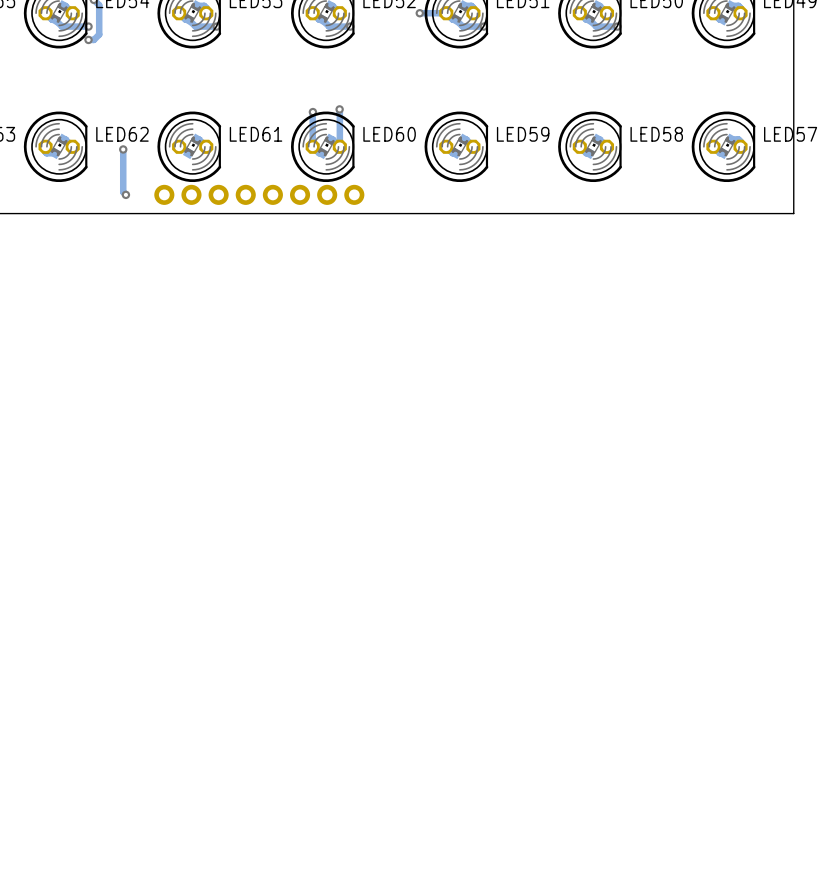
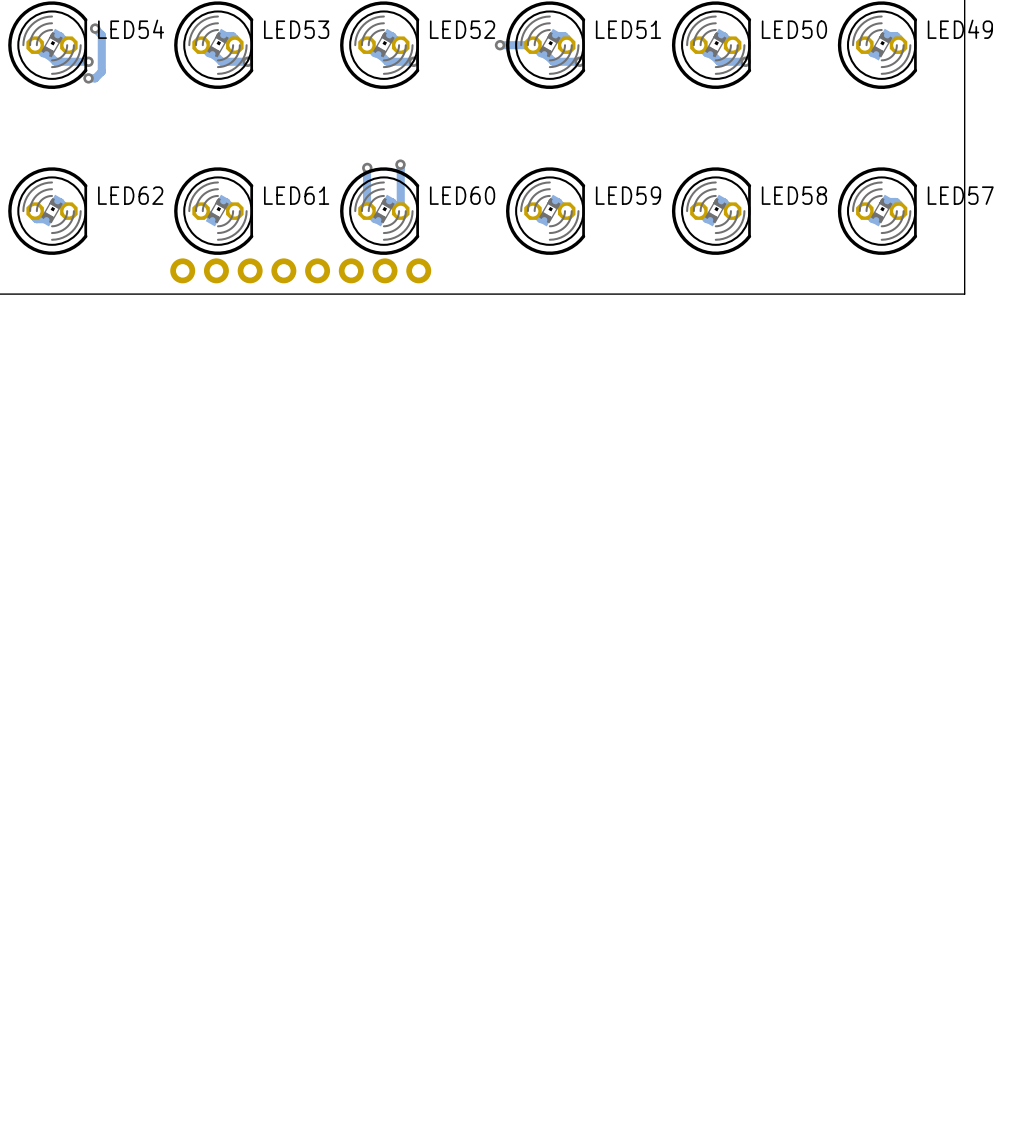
track: (123, 149) (123, 192) (125, 194) -> none
via: (123, 149) -> none
via: (125, 194) -> none

